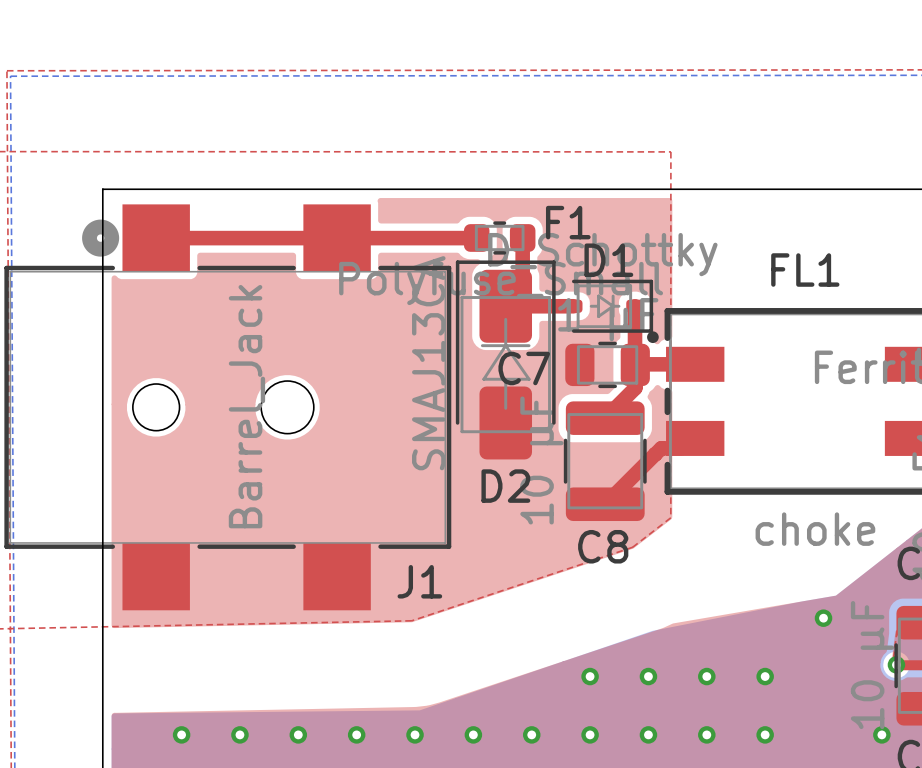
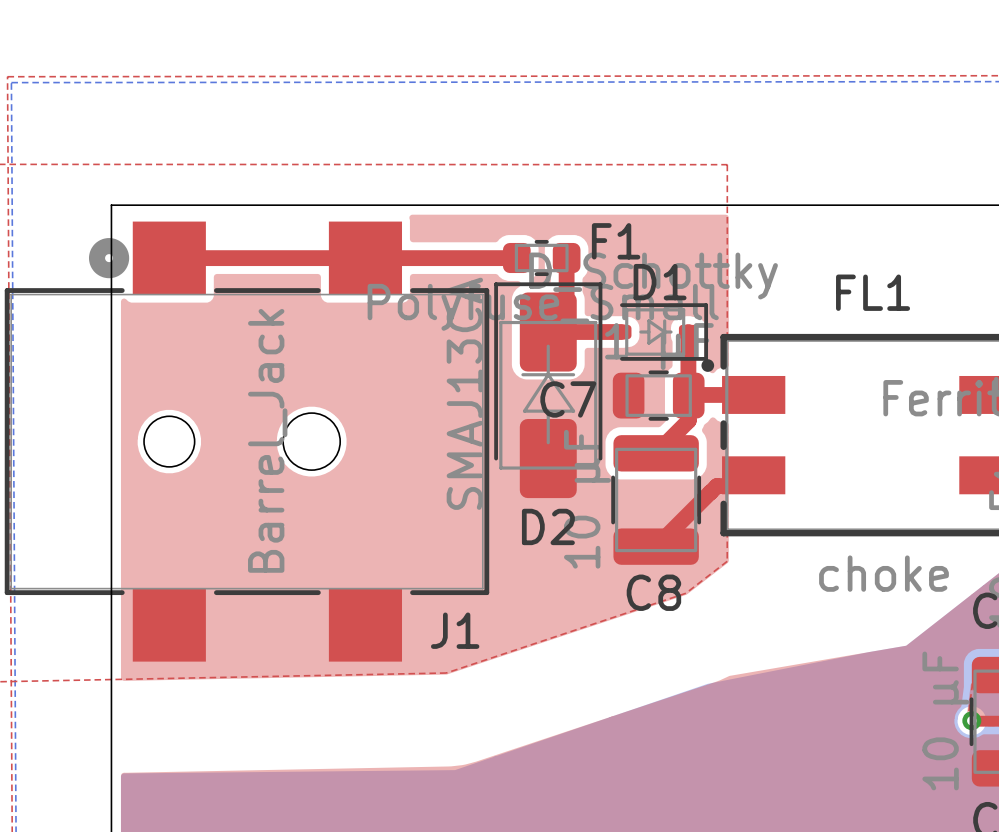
via: (823, 618) -> none
via: (590, 676) -> none
via: (648, 676) -> none
via: (706, 676) -> none
via: (765, 676) -> none
via: (181, 734) -> none
via: (239, 734) -> none
via: (298, 734) -> none
via: (356, 734) -> none
via: (415, 734) -> none
via: (473, 734) -> none
via: (531, 734) -> none
via: (590, 734) -> none
via: (648, 734) -> none
via: (706, 734) -> none
via: (765, 734) -> none
via: (881, 734) -> none

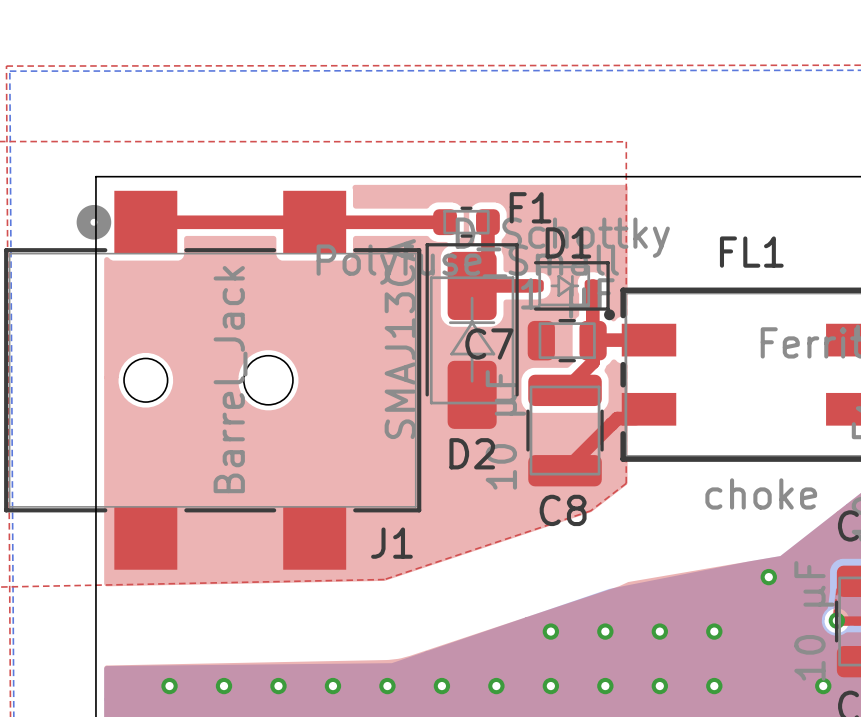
via: none -> (768, 577)
via: none -> (550, 631)
via: none -> (605, 631)
via: none -> (659, 631)
via: none -> (714, 631)
via: none -> (169, 686)
via: none -> (224, 686)
via: none -> (278, 686)
via: none -> (332, 686)
via: none -> (387, 686)
via: none -> (441, 686)
via: none -> (496, 686)
via: none -> (550, 686)
via: none -> (605, 686)
via: none -> (659, 686)
via: none -> (714, 686)
via: none -> (823, 686)

